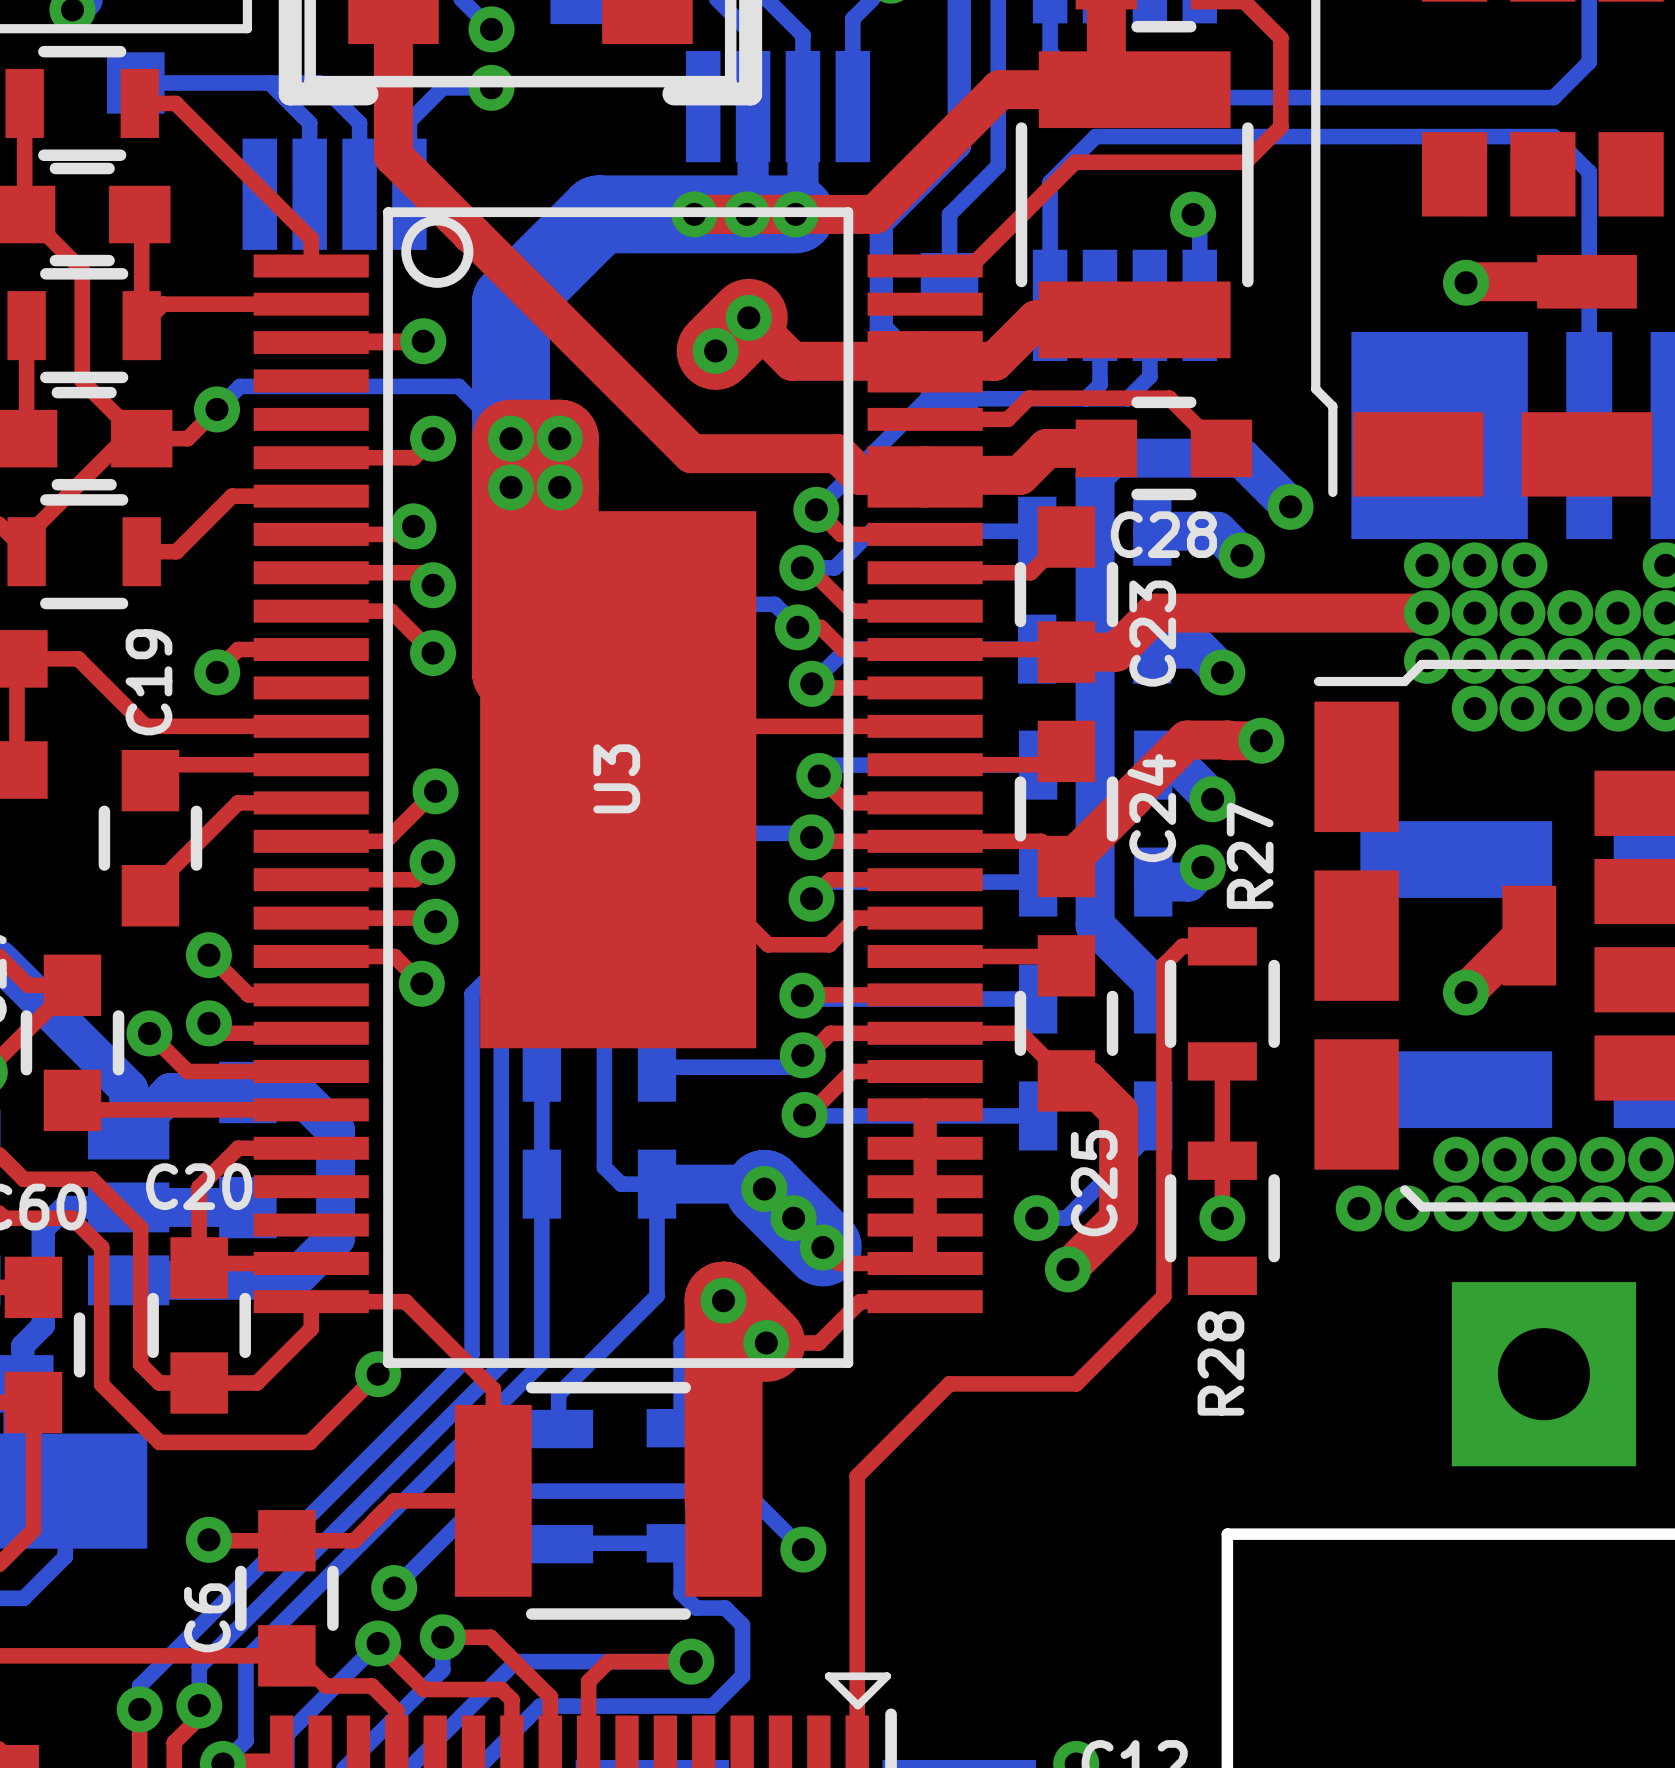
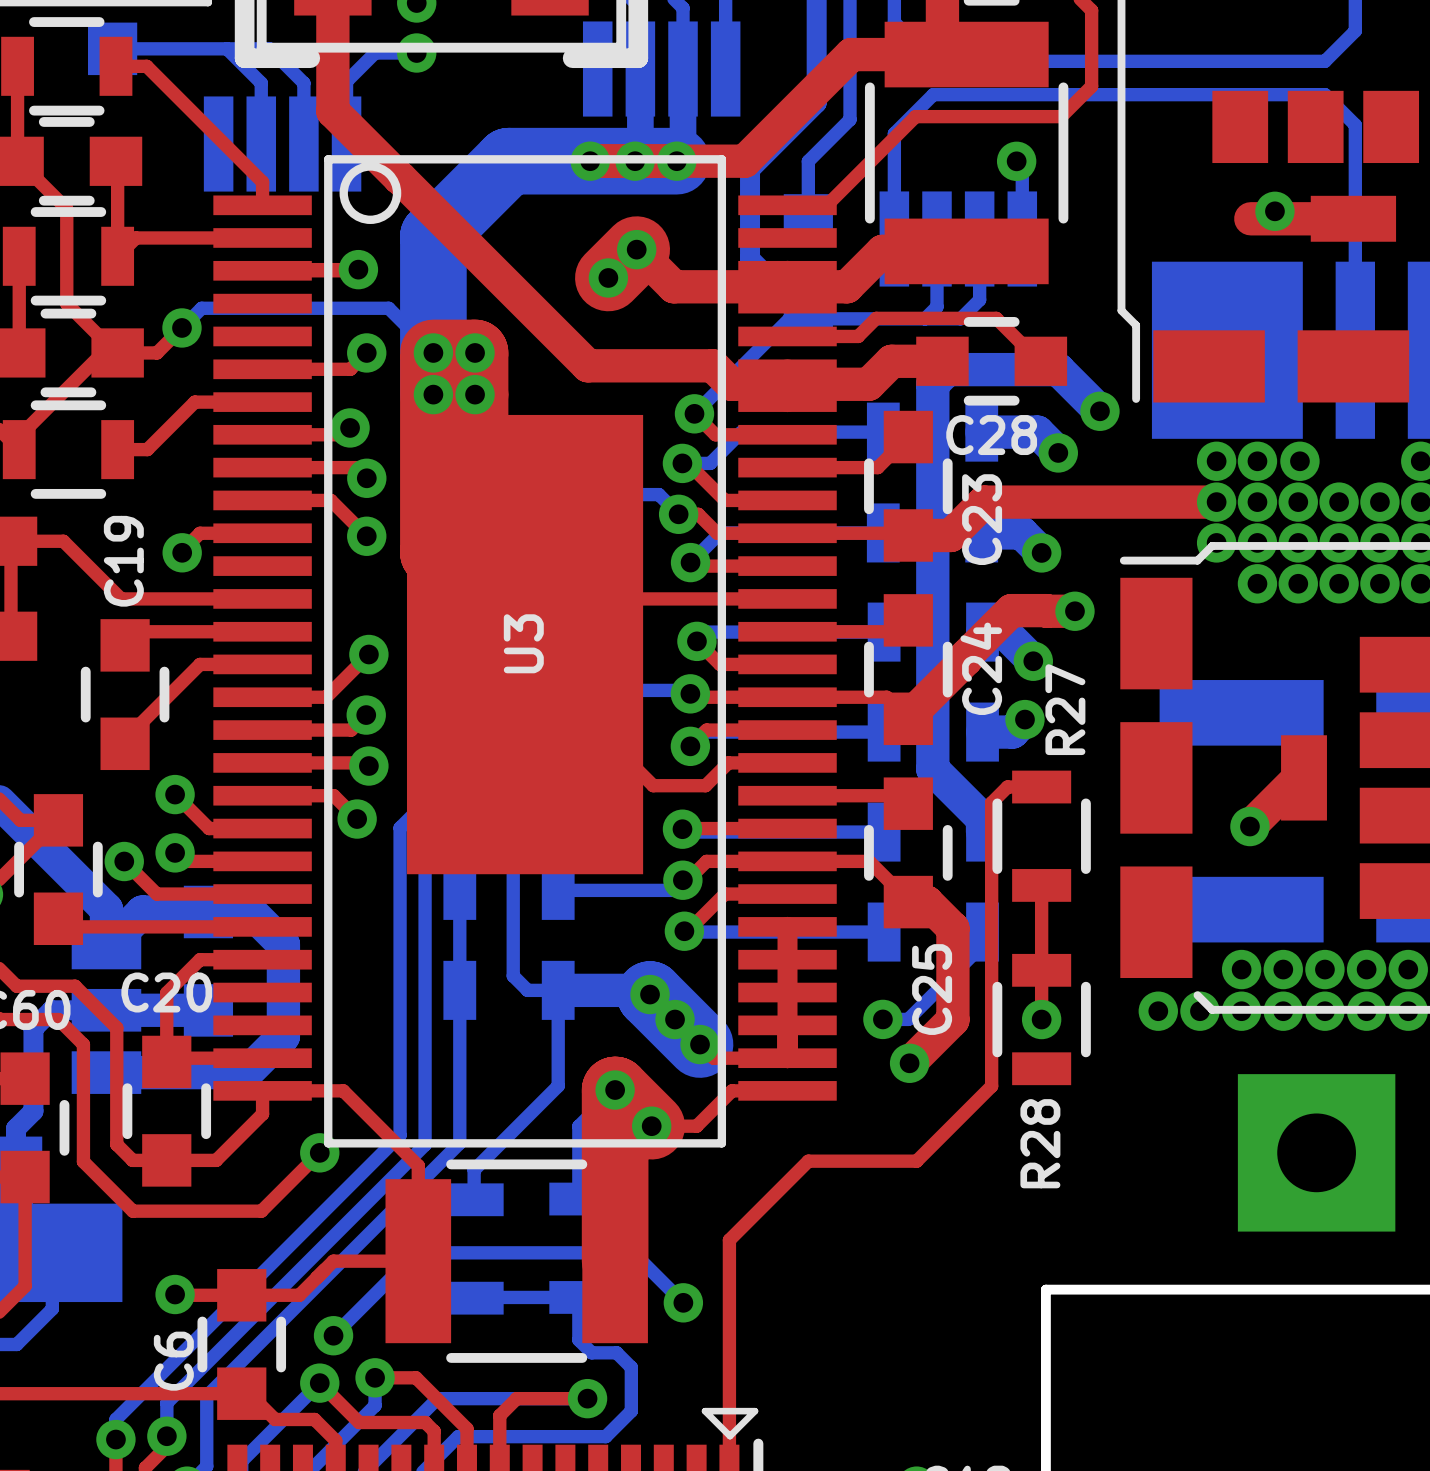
via position: (1466, 282) -> (1274, 211)

